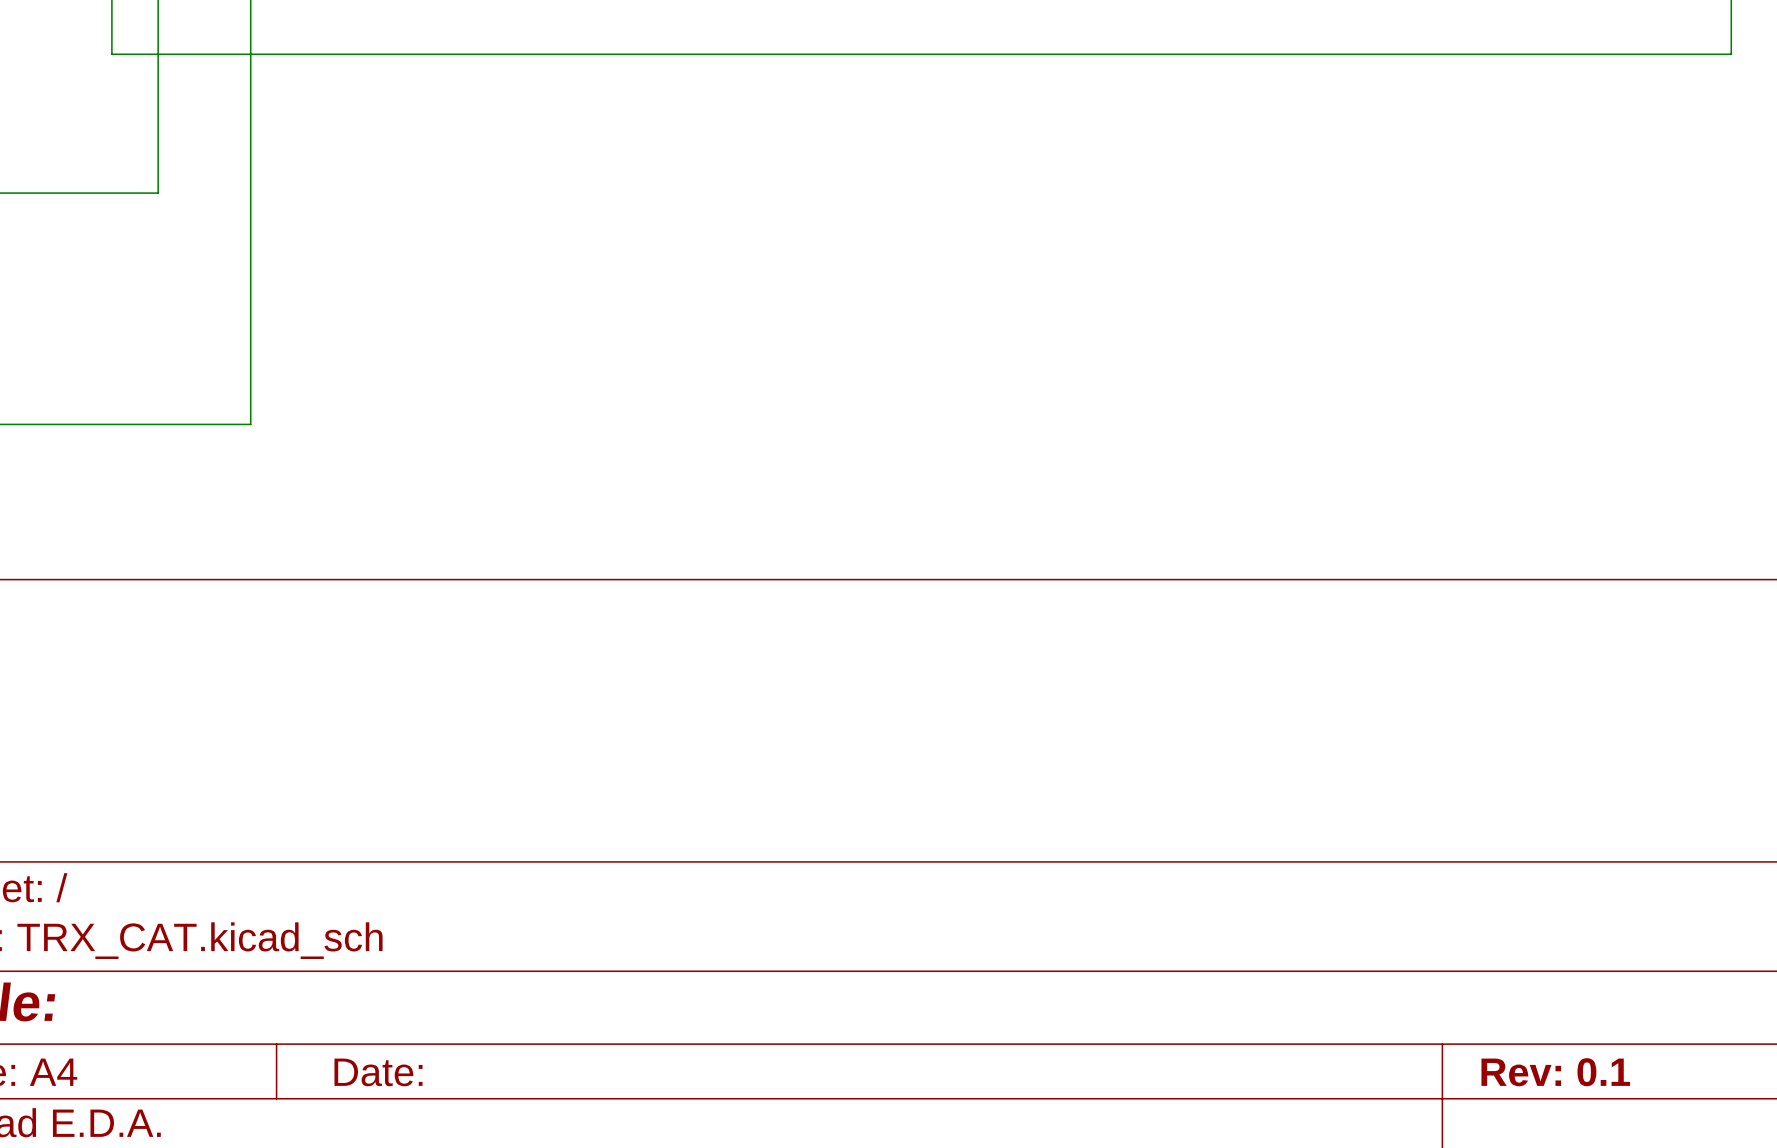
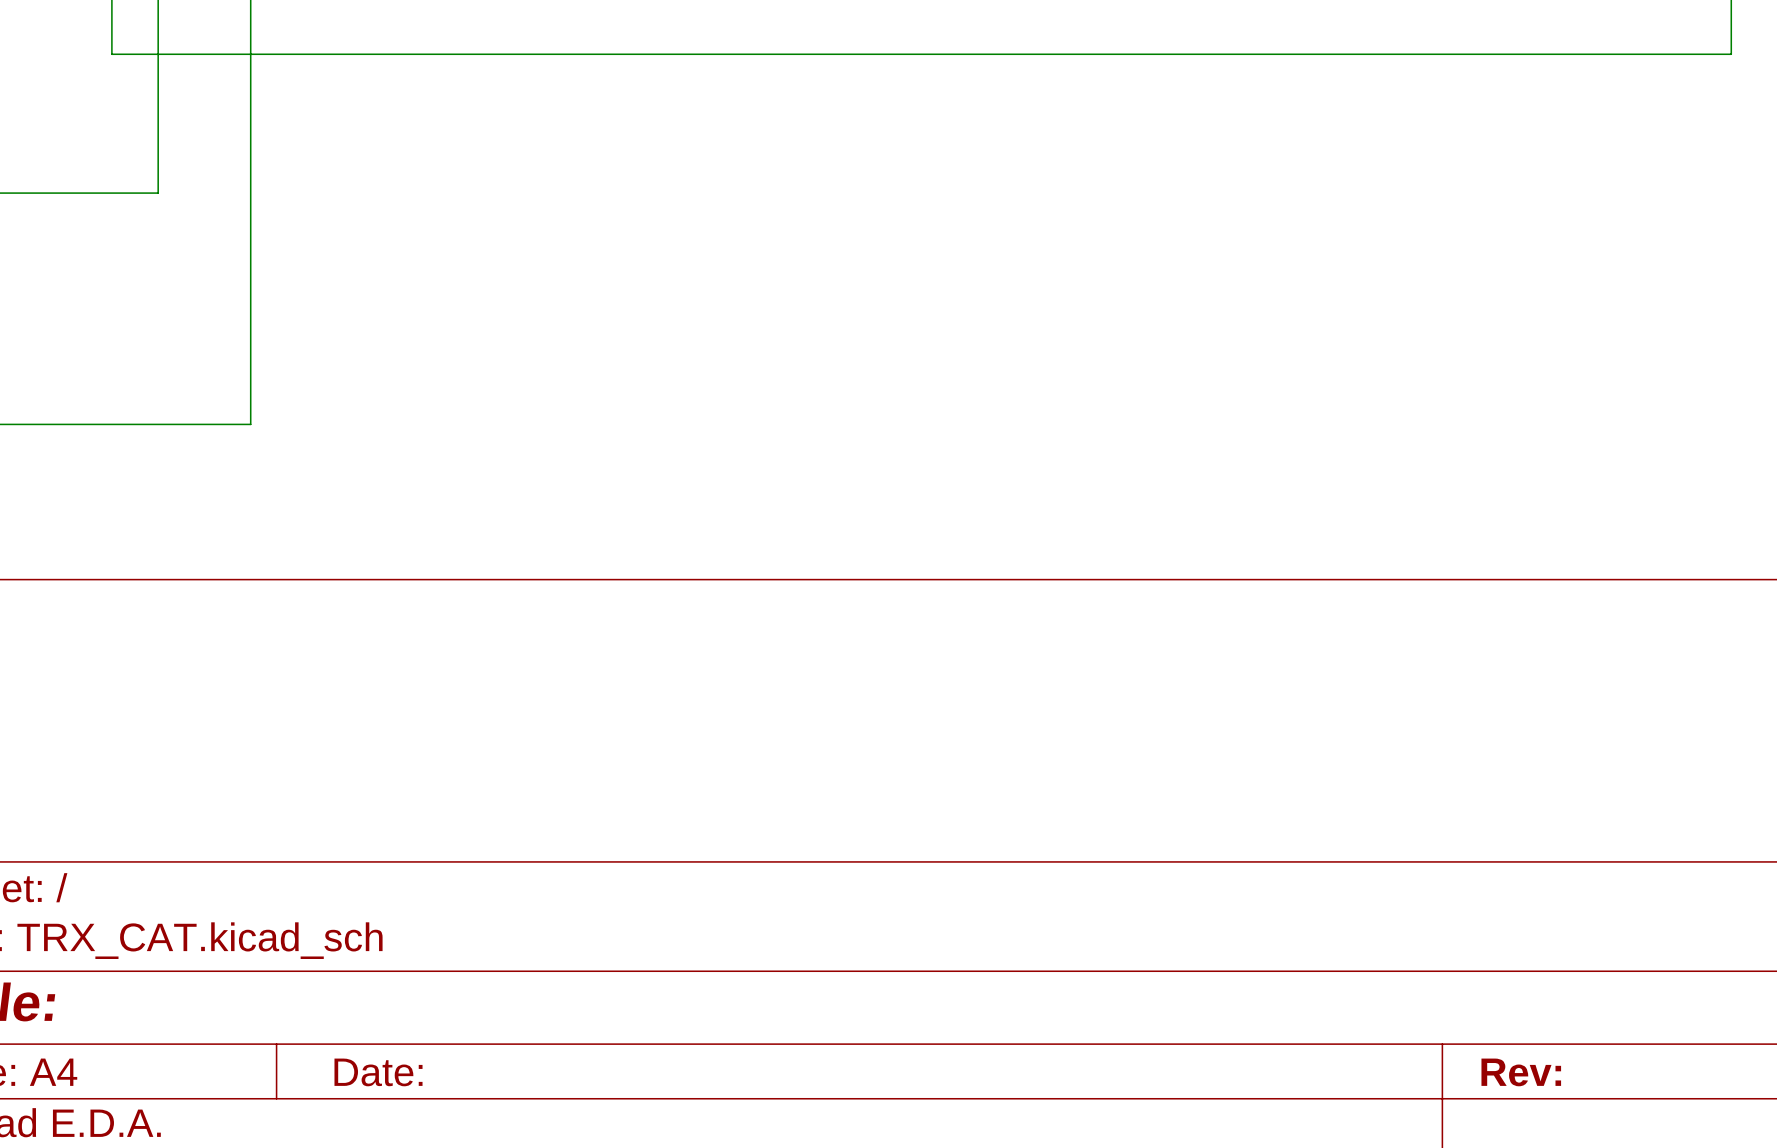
title block: Rev: 0.1 (1555, 1072) -> Rev: (1521, 1072)

